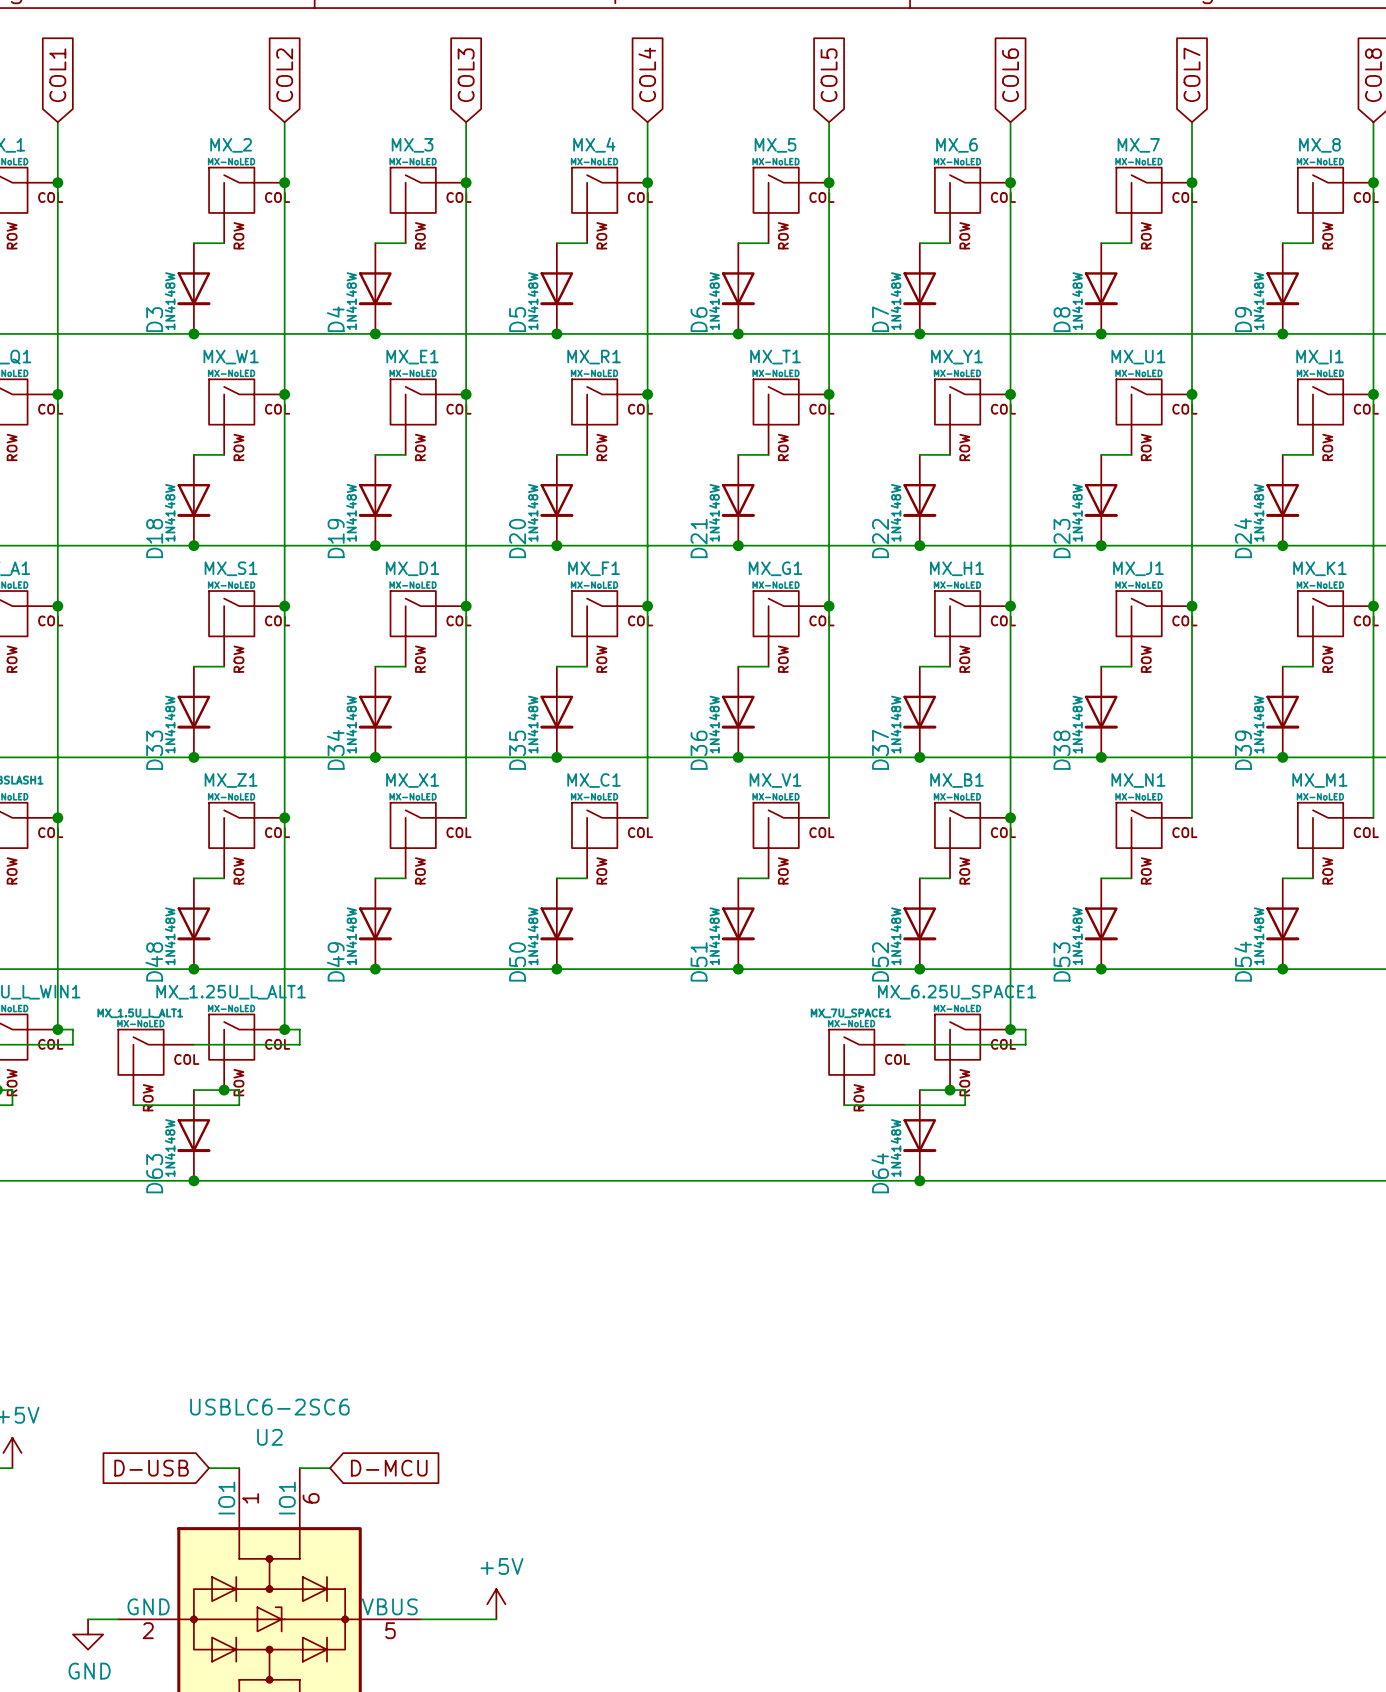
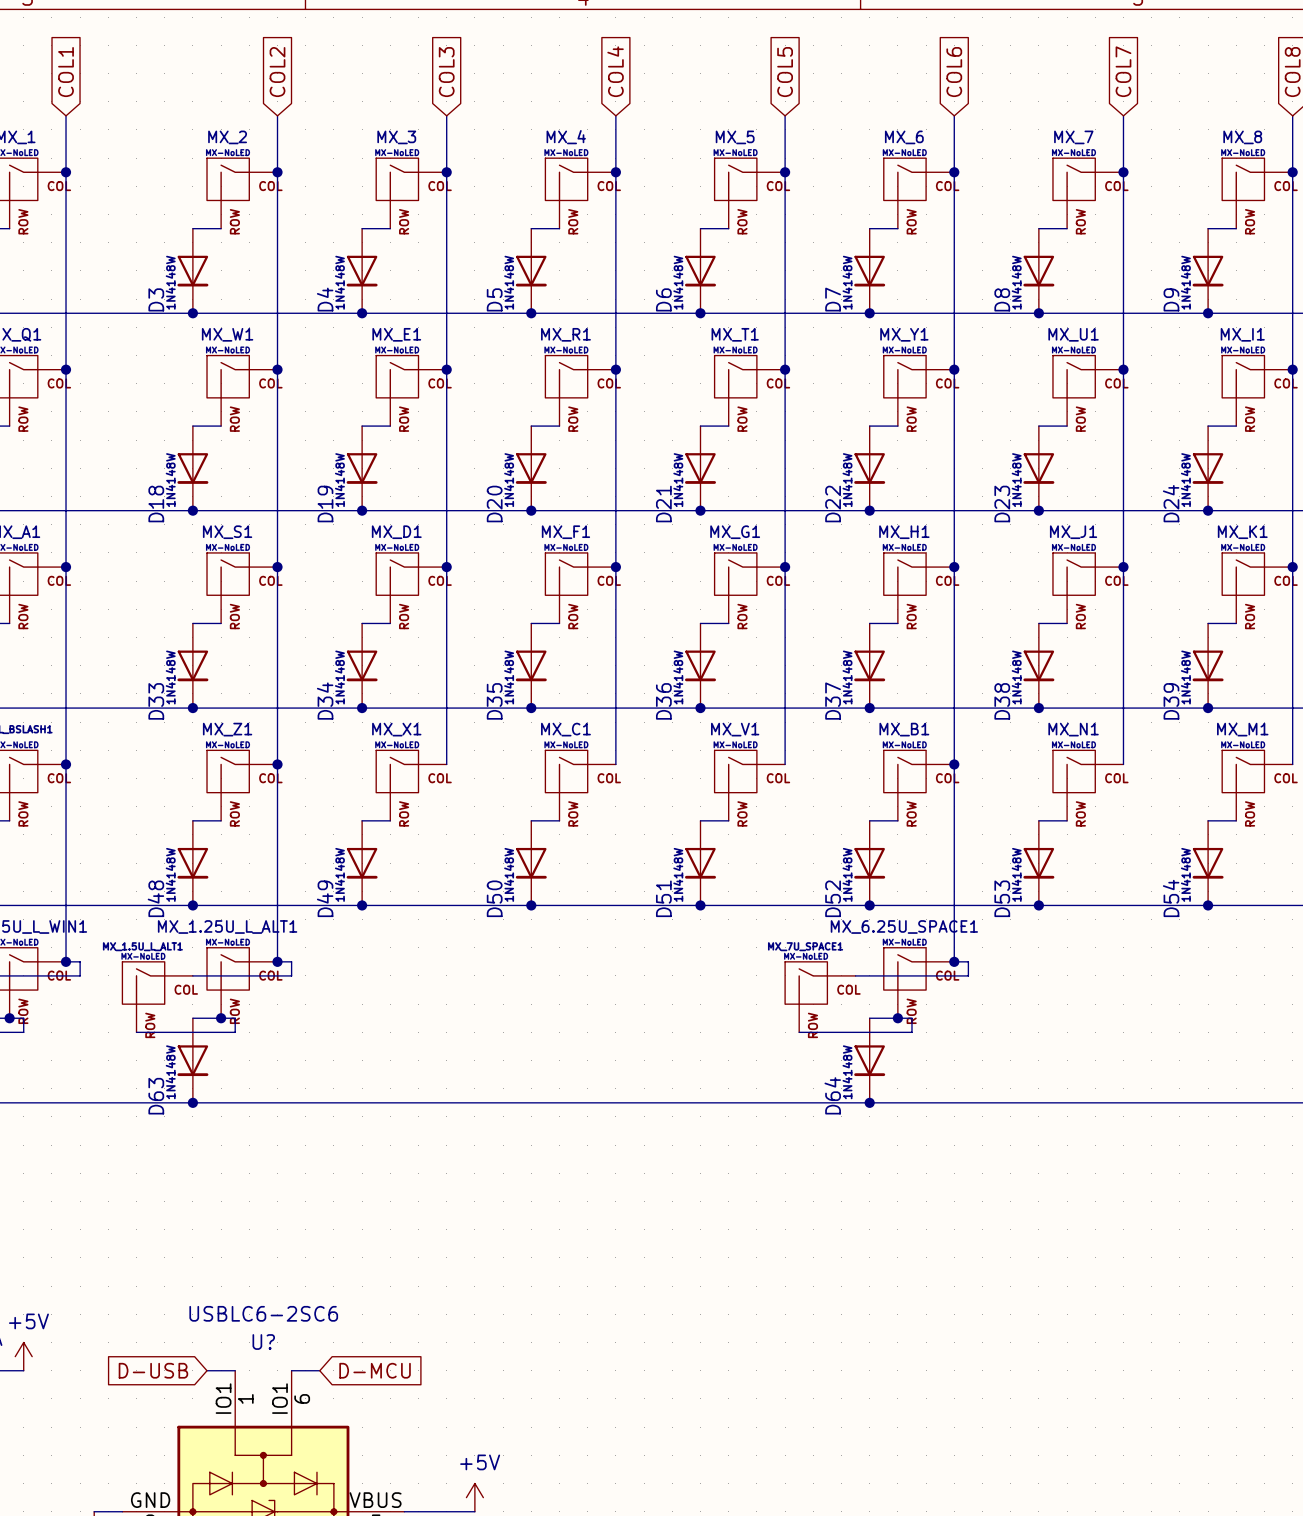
U2 name: U2 (269, 1437) -> U? (263, 1342)

